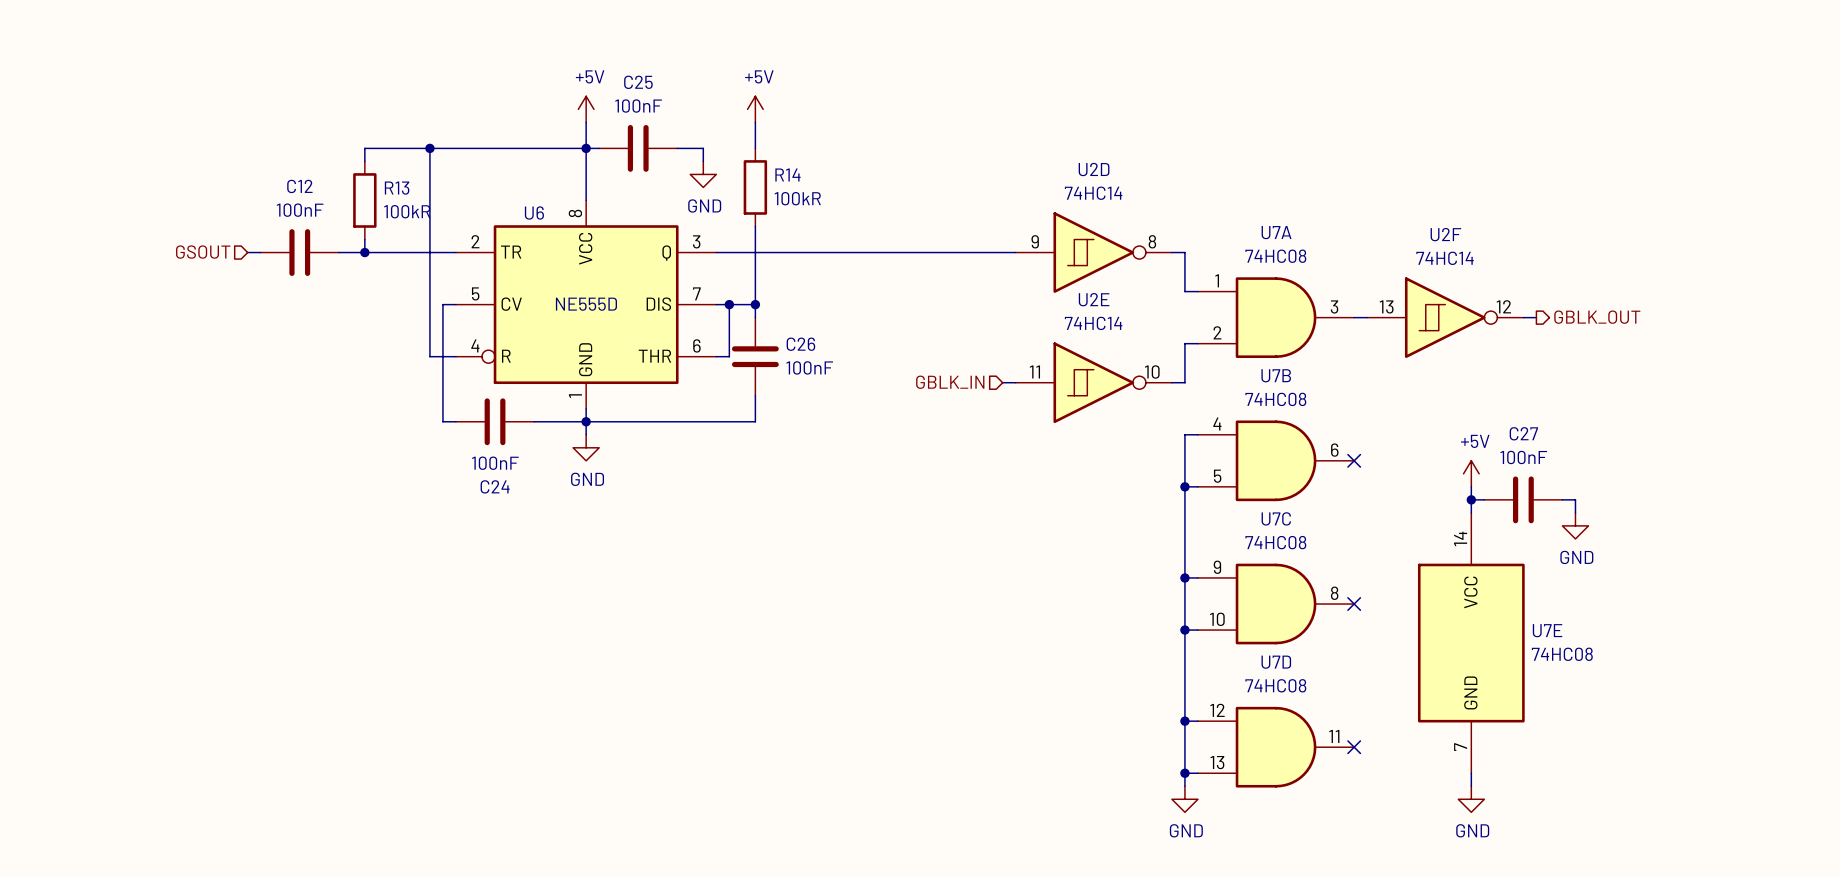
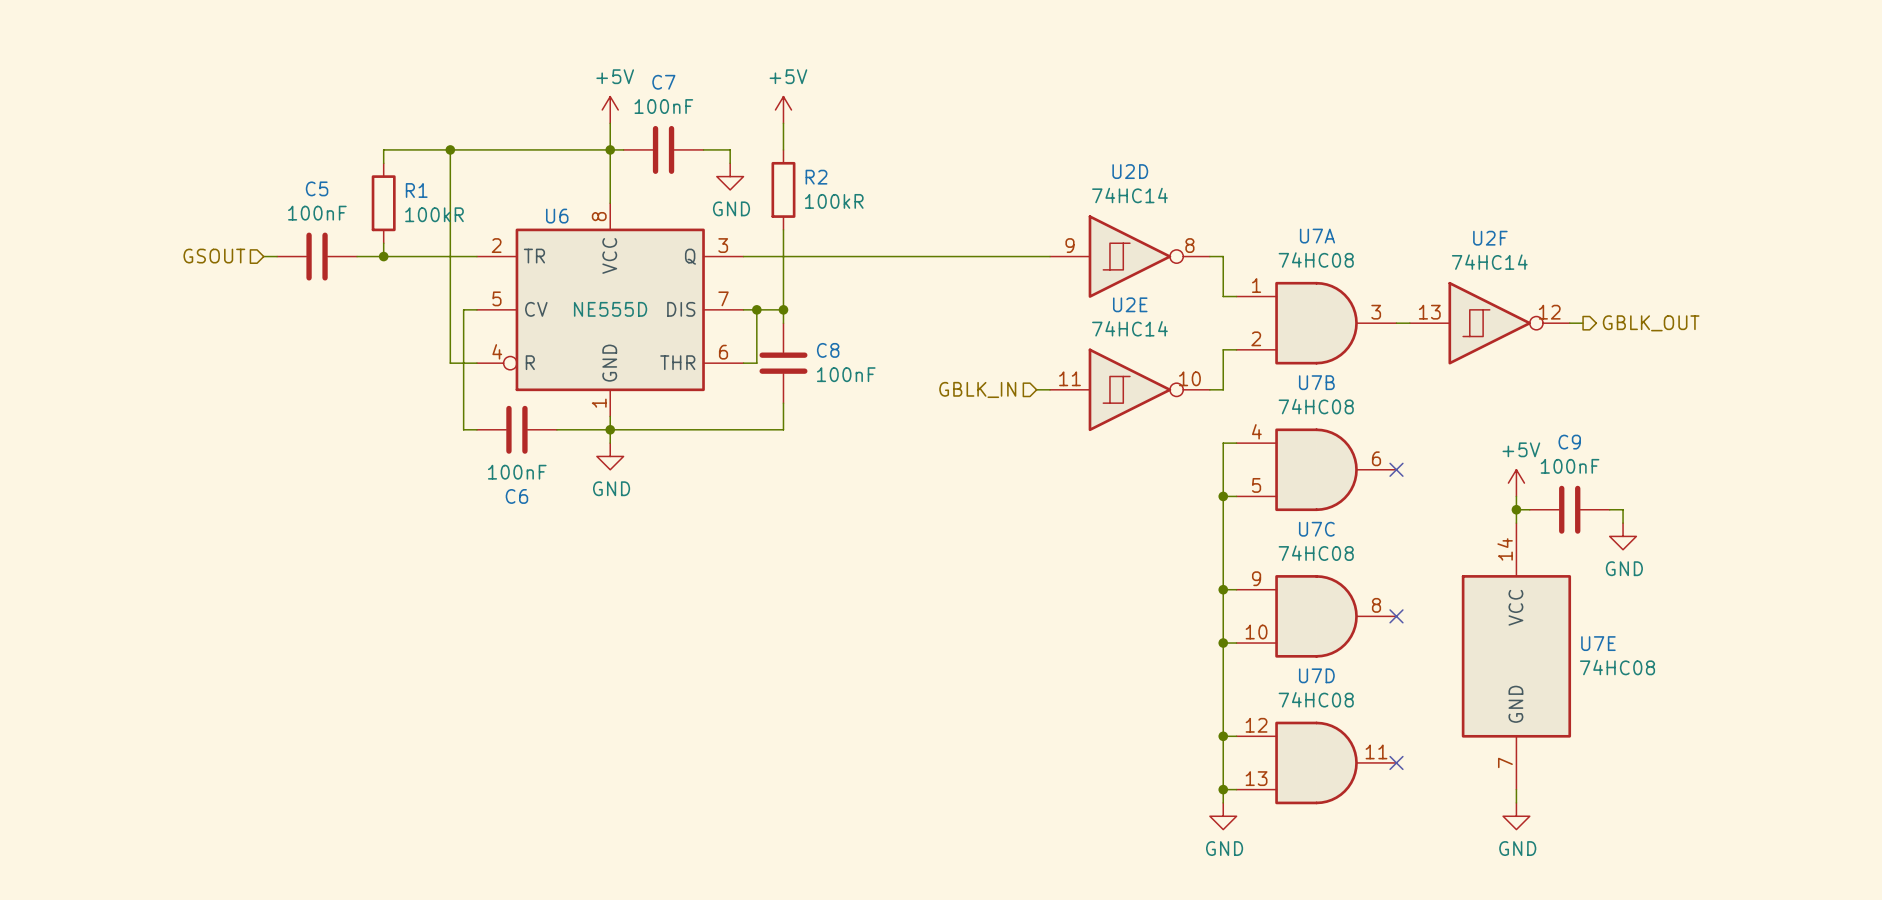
C25 name: C25 (638, 82) -> C7 (663, 82)
R14 name: R14 (787, 174) -> R2 (816, 177)
C12 name: C12 (299, 186) -> C5 (317, 188)
R13 name: R13 (397, 188) -> R1 (416, 190)
C26 name: C26 (800, 344) -> C8 (828, 350)
C27 name: C27 (1523, 433) -> C9 (1569, 442)
C24 name: C24 (495, 486) -> C6 (516, 496)

